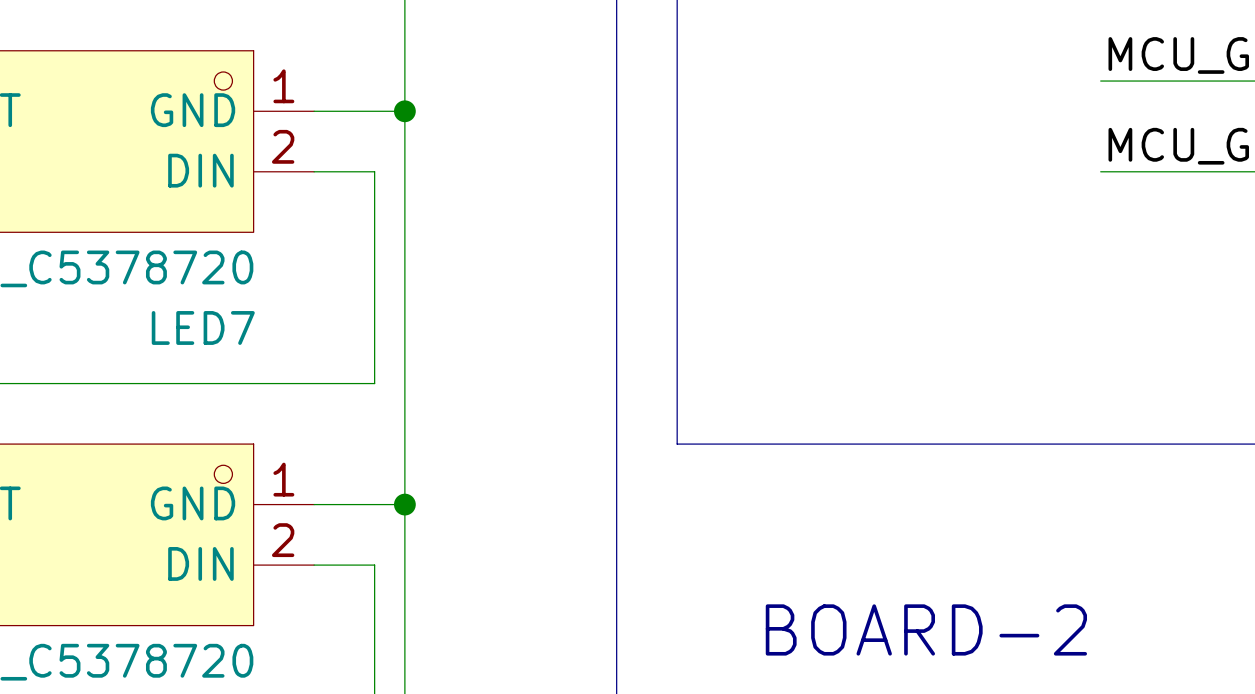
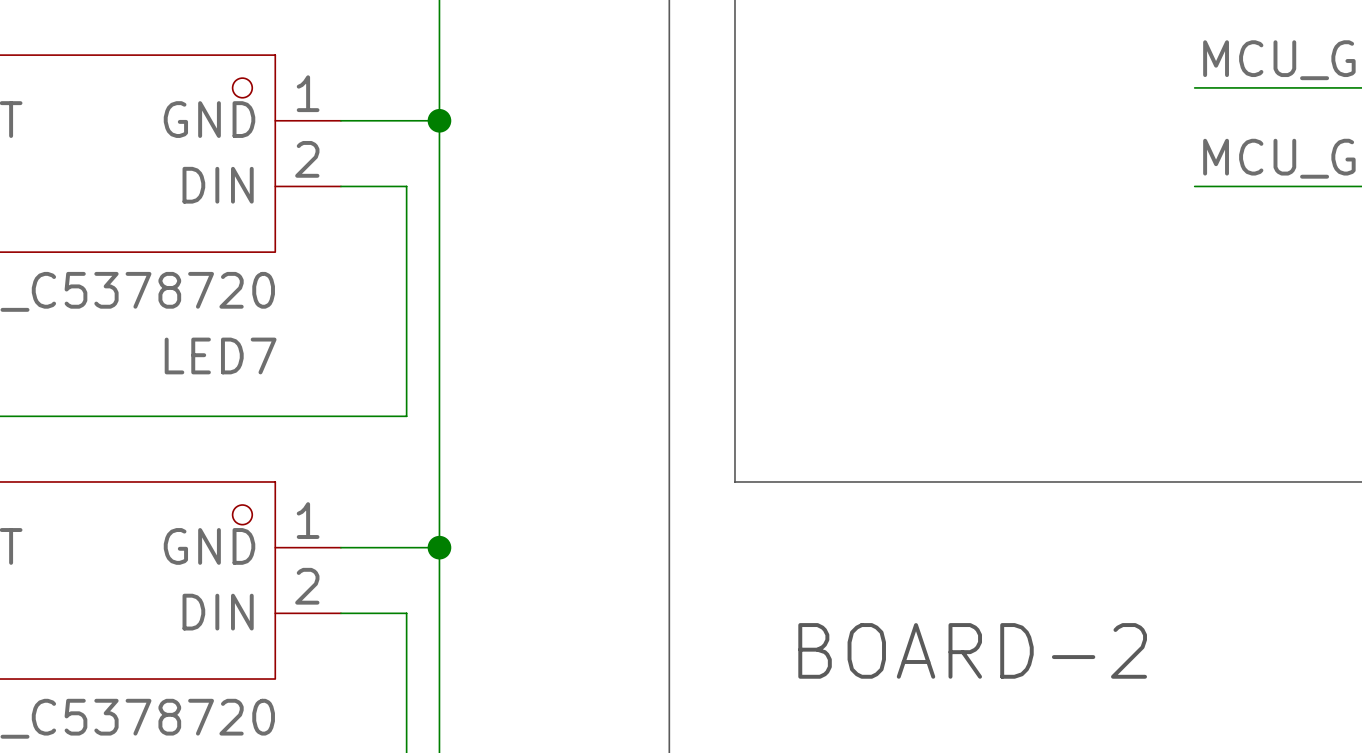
text position: BOARD-2 (926, 629) -> BOARD-2 (972, 650)

